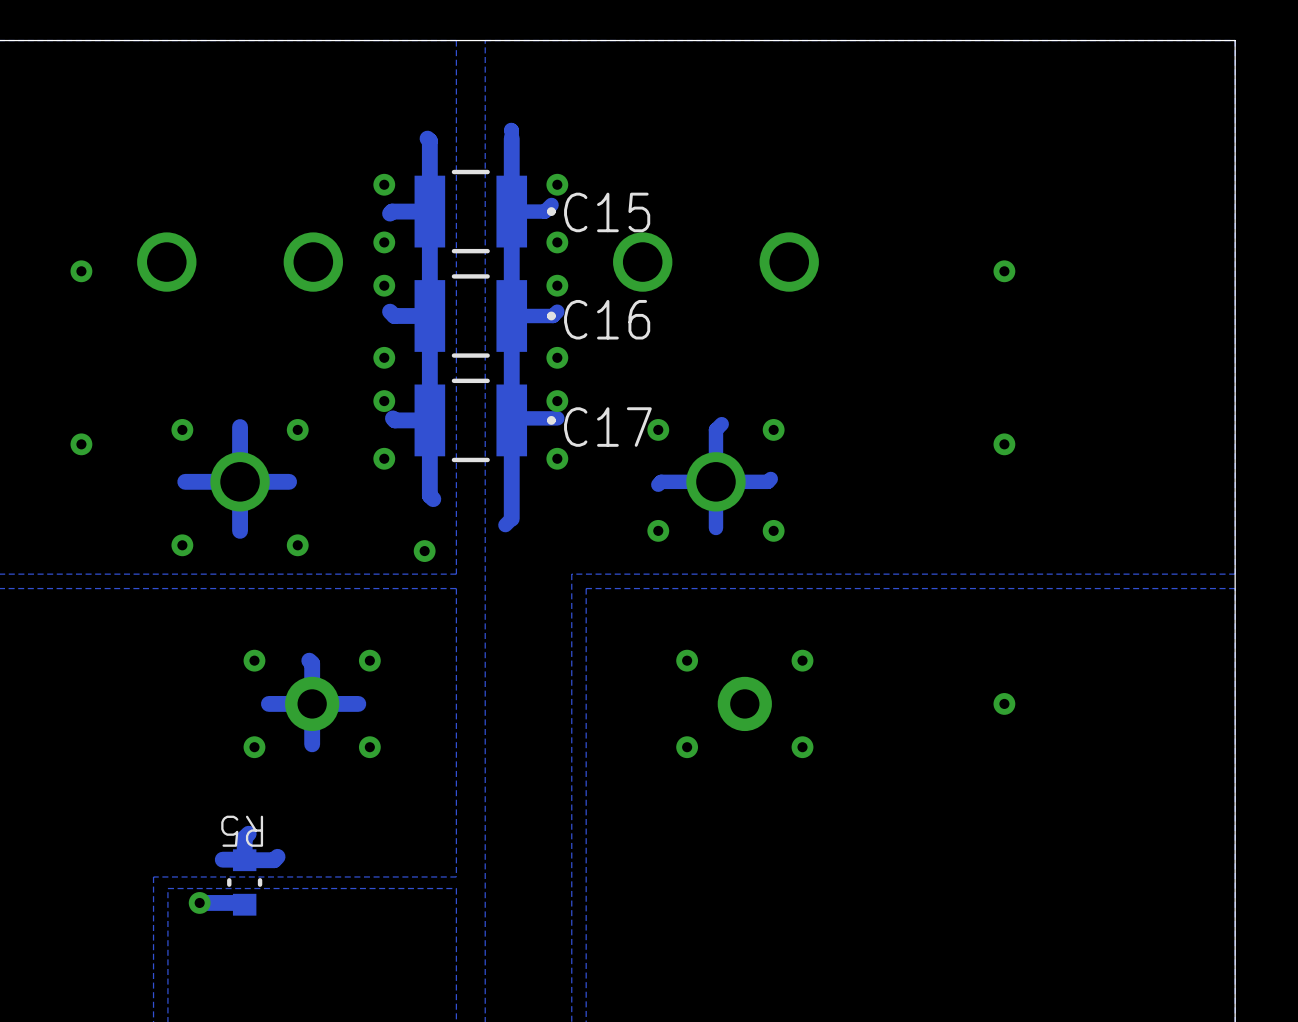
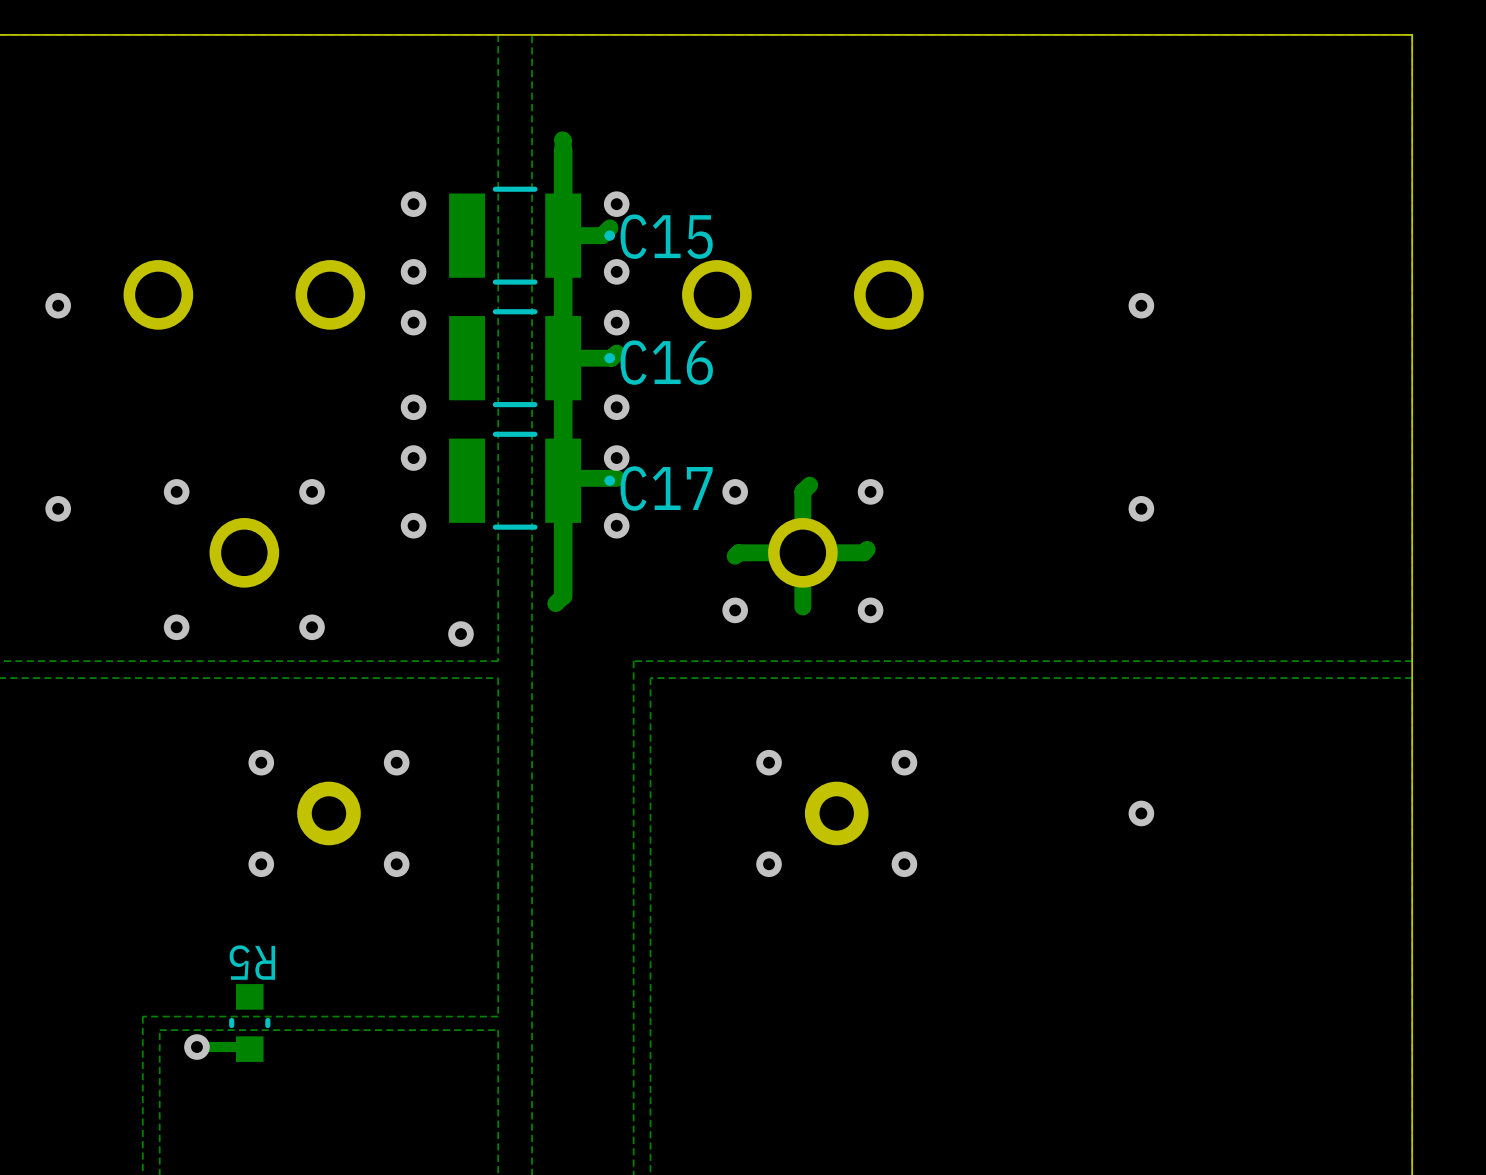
track: (427, 138) (429, 140) (429, 495) (433, 499) -> none
track: (429, 211) (392, 211) (390, 213) -> none
track: (390, 311) (394, 315) (429, 315) -> none
track: (392, 418) (394, 420) (429, 420) -> none
track: (240, 427) (240, 530) -> none
track: (289, 481) (185, 481) -> none
track: (309, 660) (312, 663) (312, 744) -> none
track: (358, 703) (268, 703) -> none
track: (248, 833) (244, 837) (244, 860) -> none
track: (277, 856) (274, 860) (244, 860) -> none
track: (222, 859) (244, 860) -> none
track width: thick (199, 902) (242, 902) (244, 904) -> thin (196, 1047) (247, 1047) (249, 1049)

